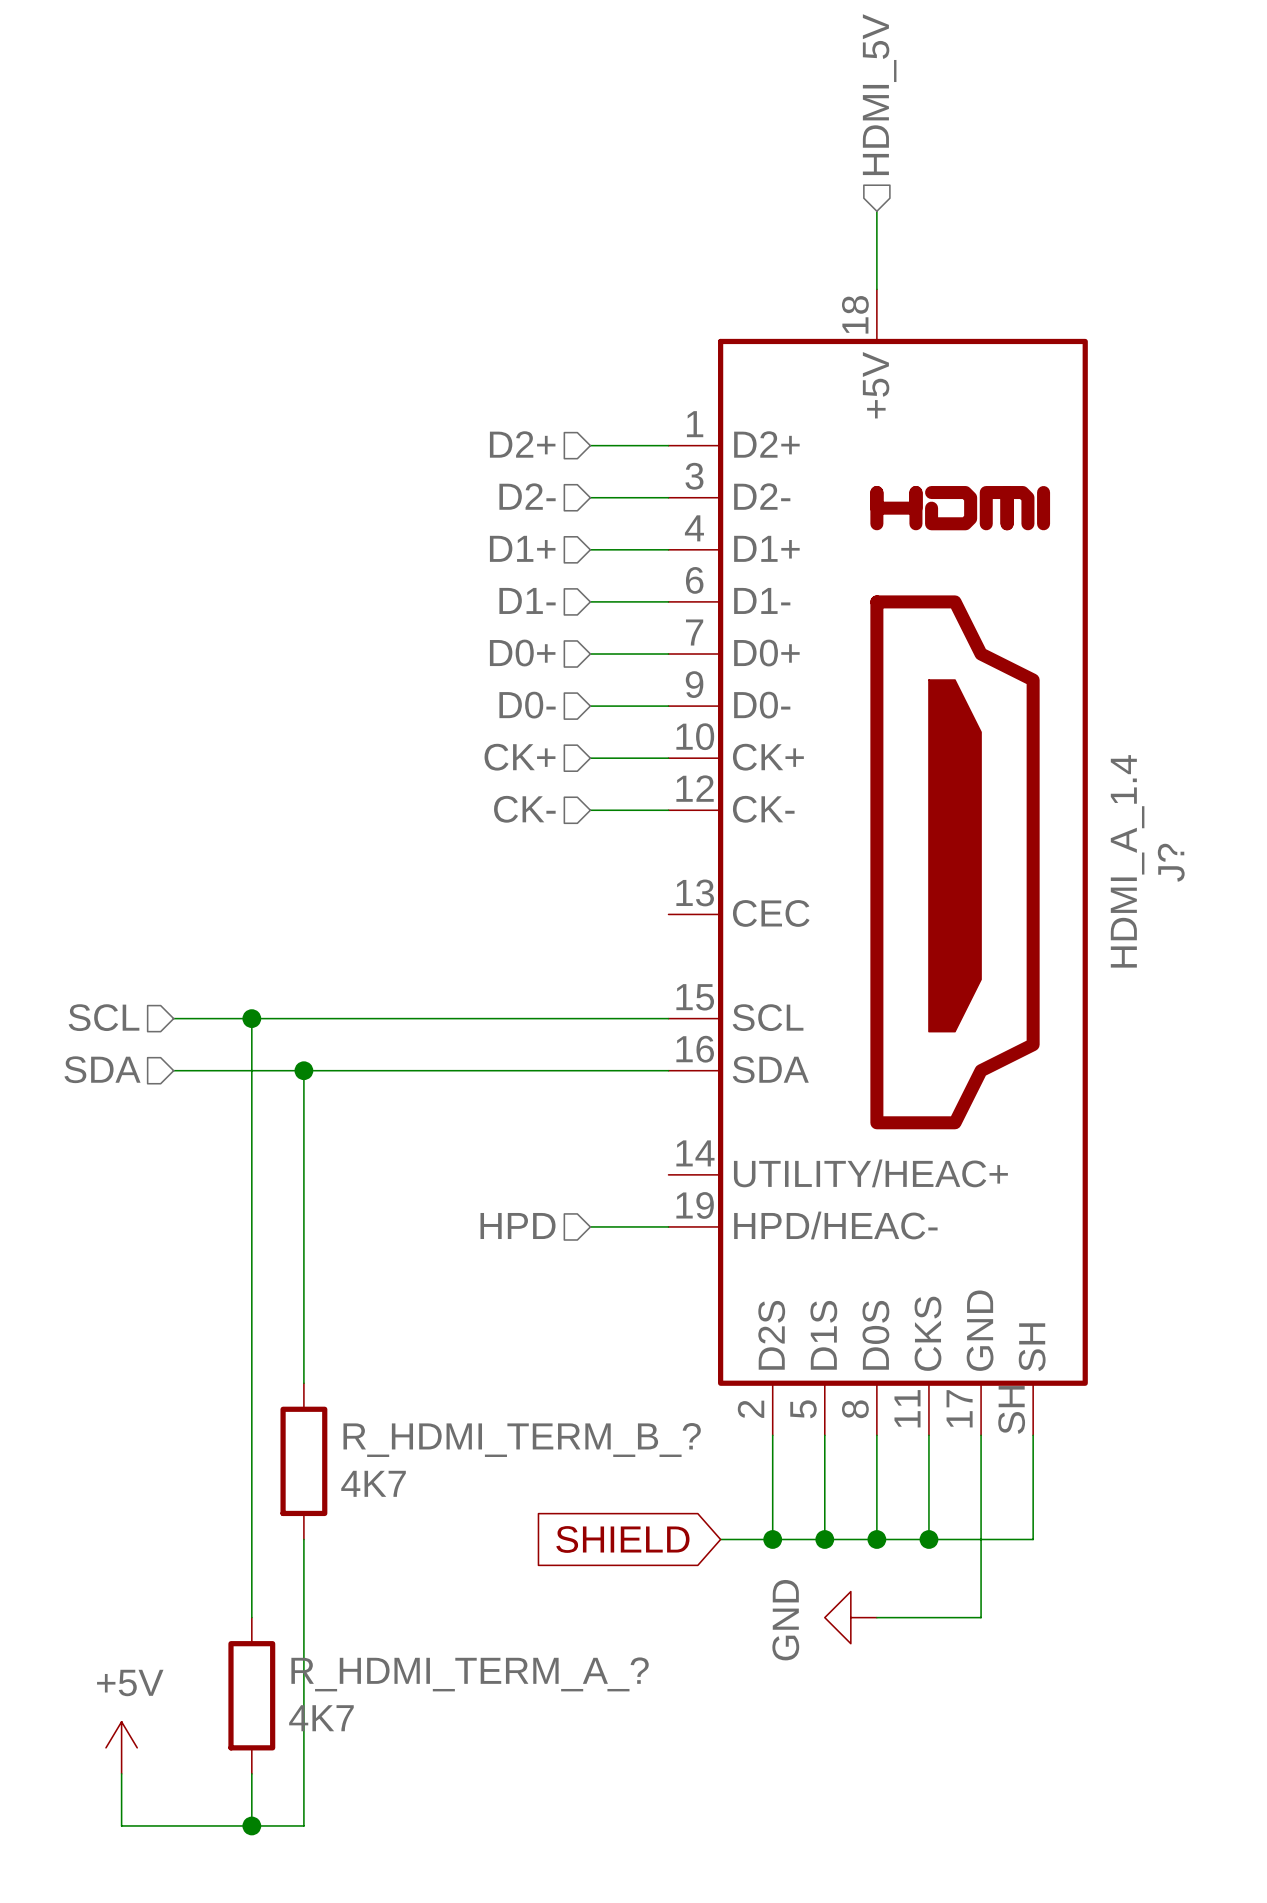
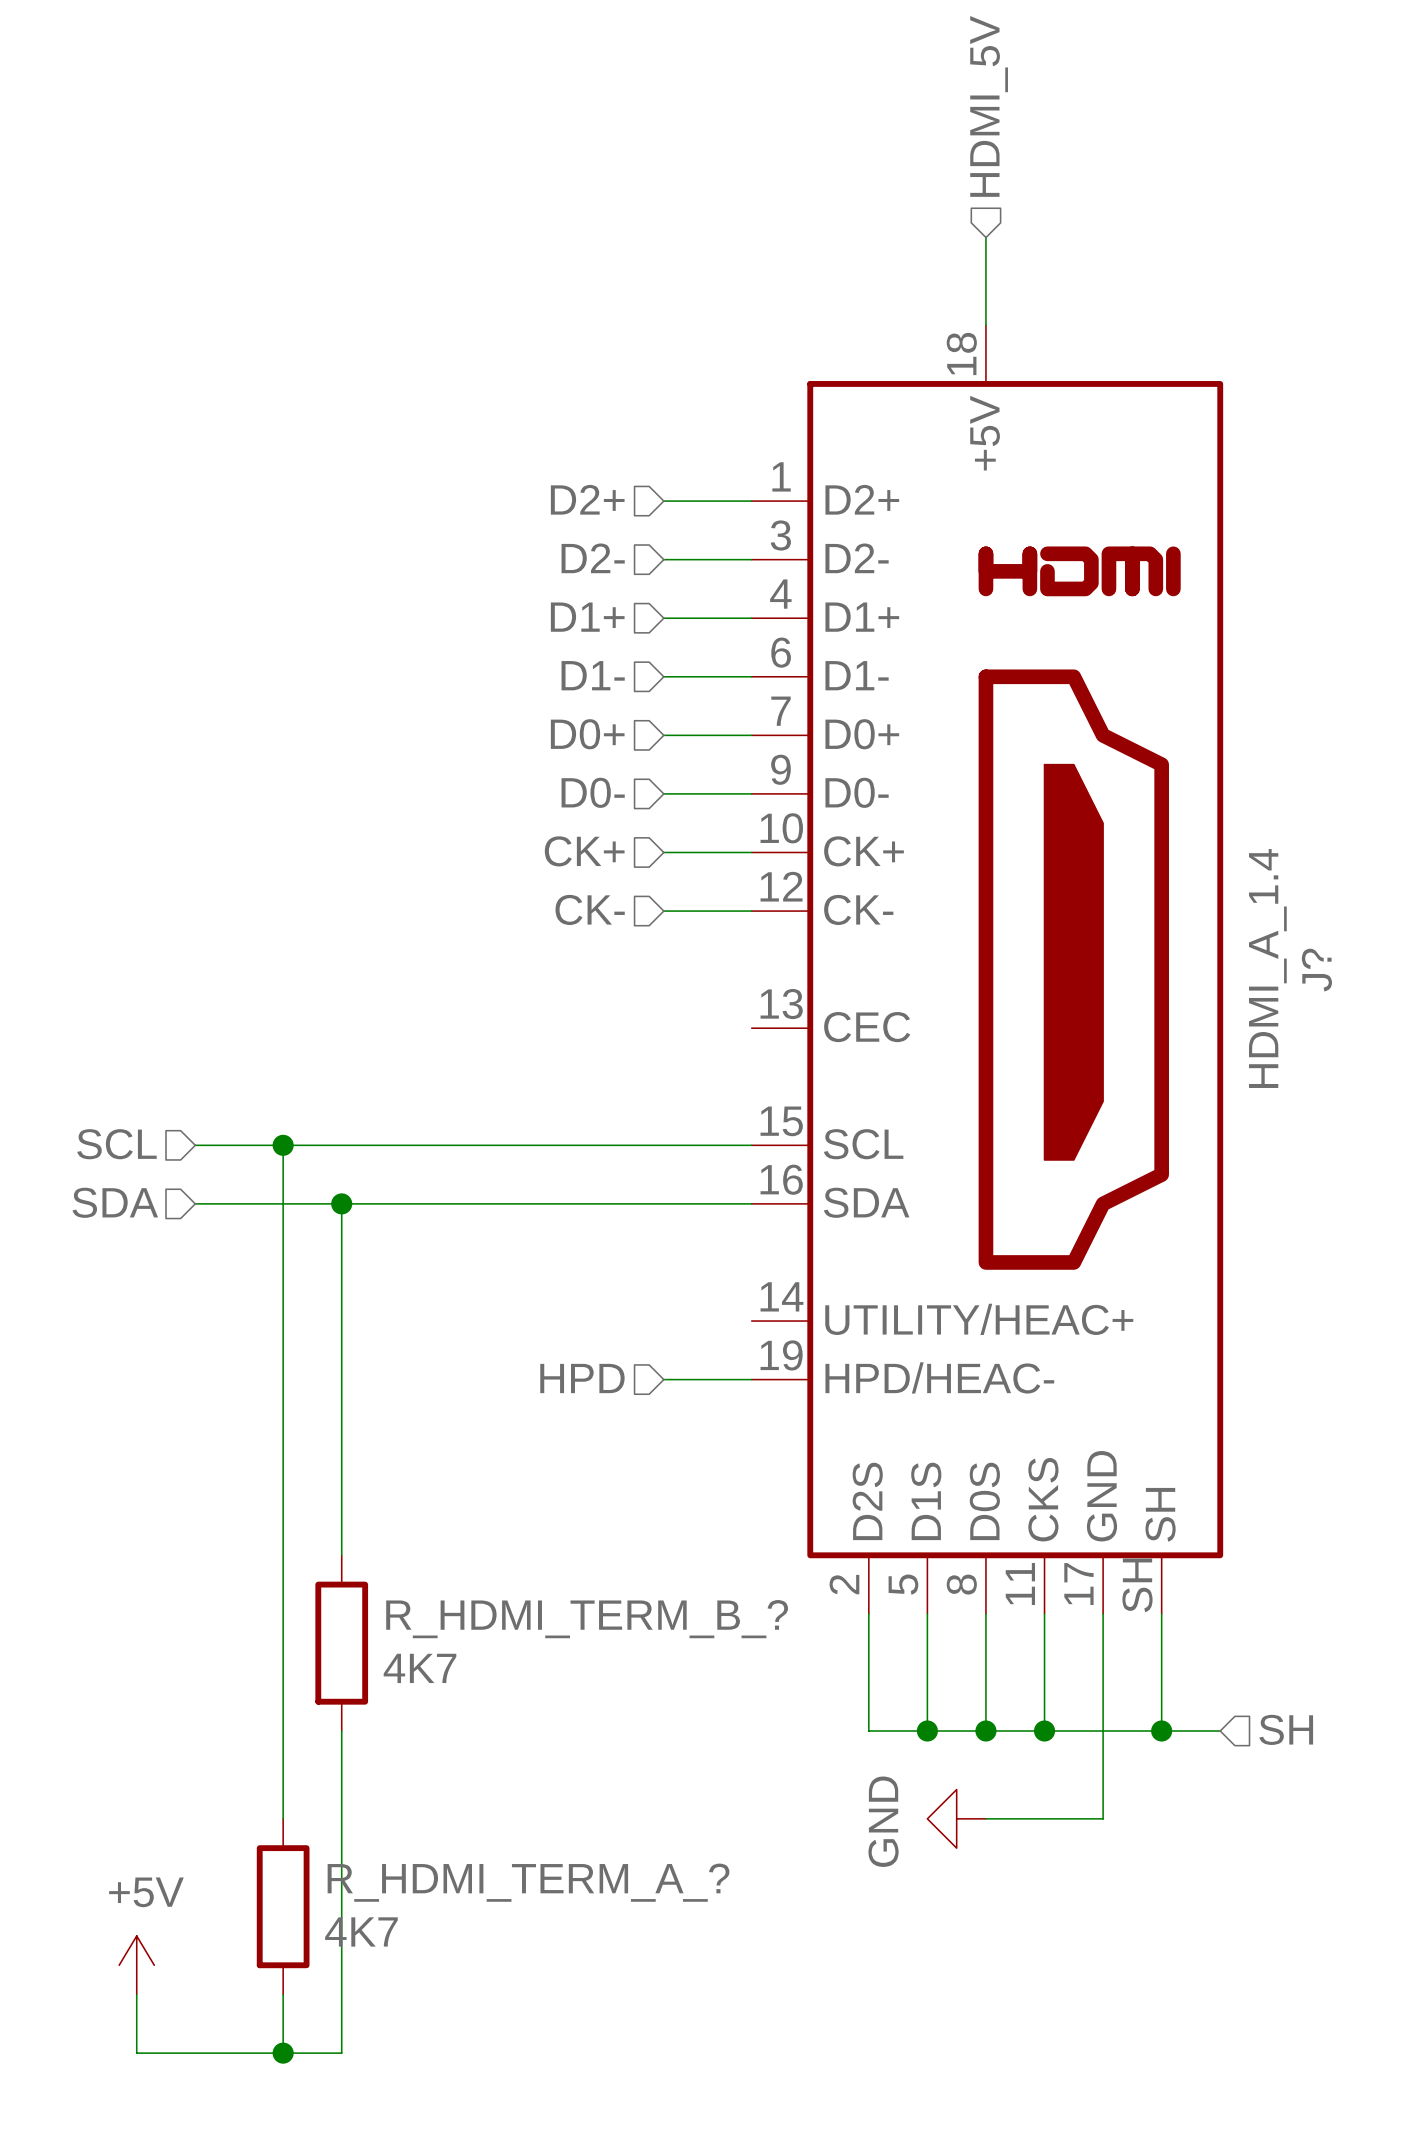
hierarchical label: none -> SH (1286, 1729)
global label: SHIELD (622, 1539) -> none
wire: (720, 1539) (772, 1539) -> (1161, 1731) (1220, 1731)
junction: (772, 1539) -> none
junction: none -> (1161, 1731)

